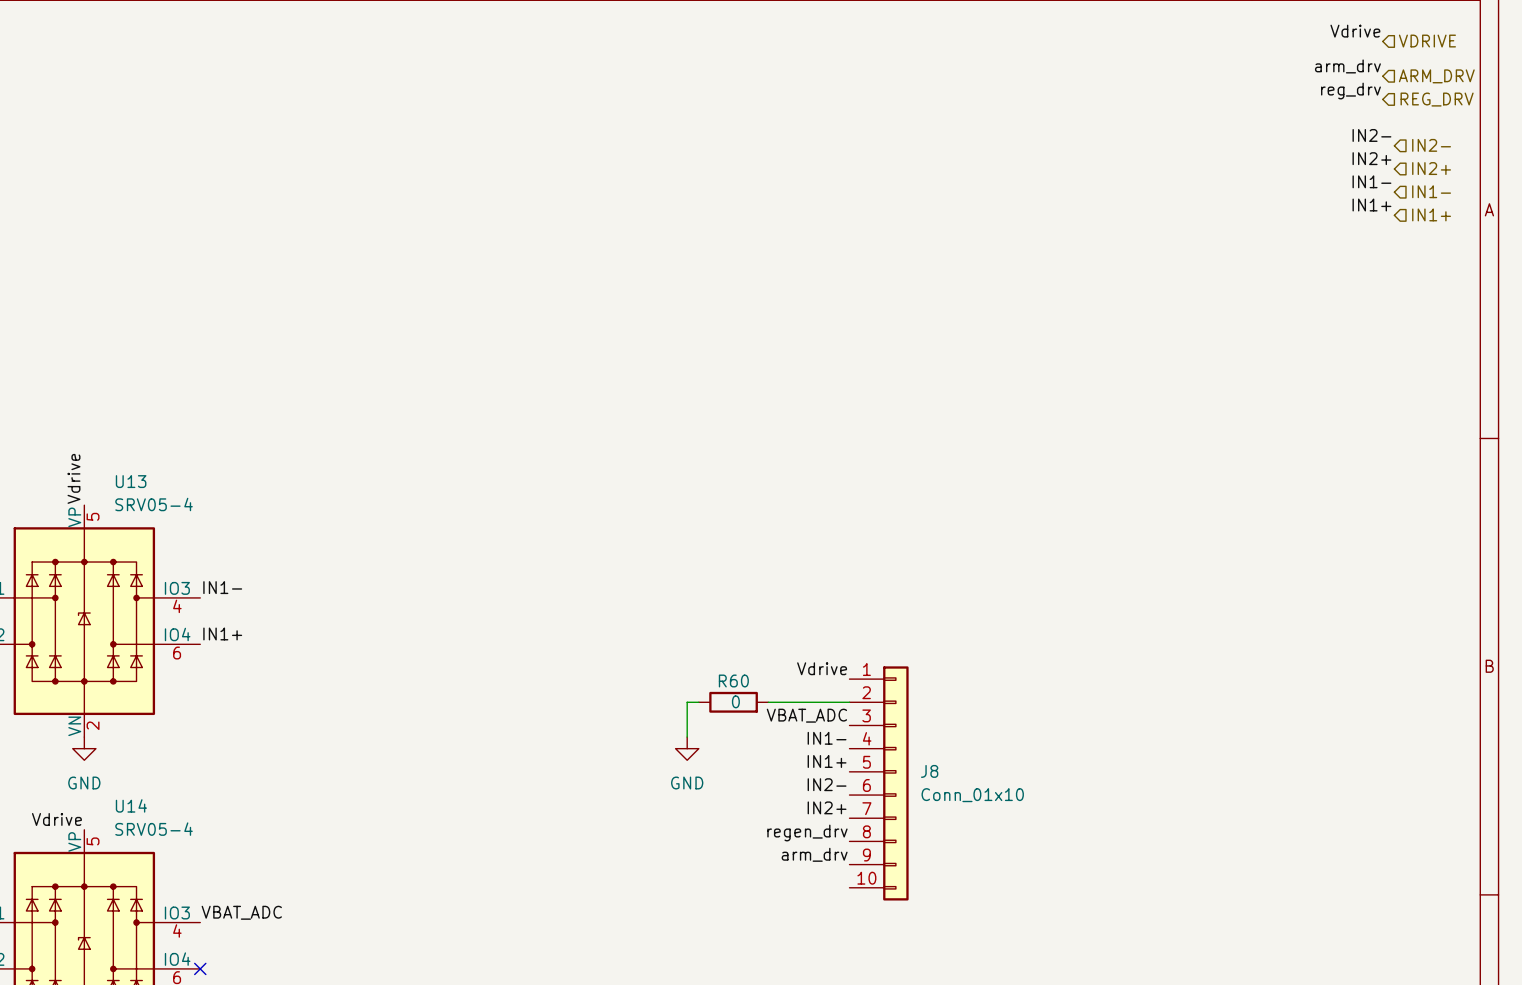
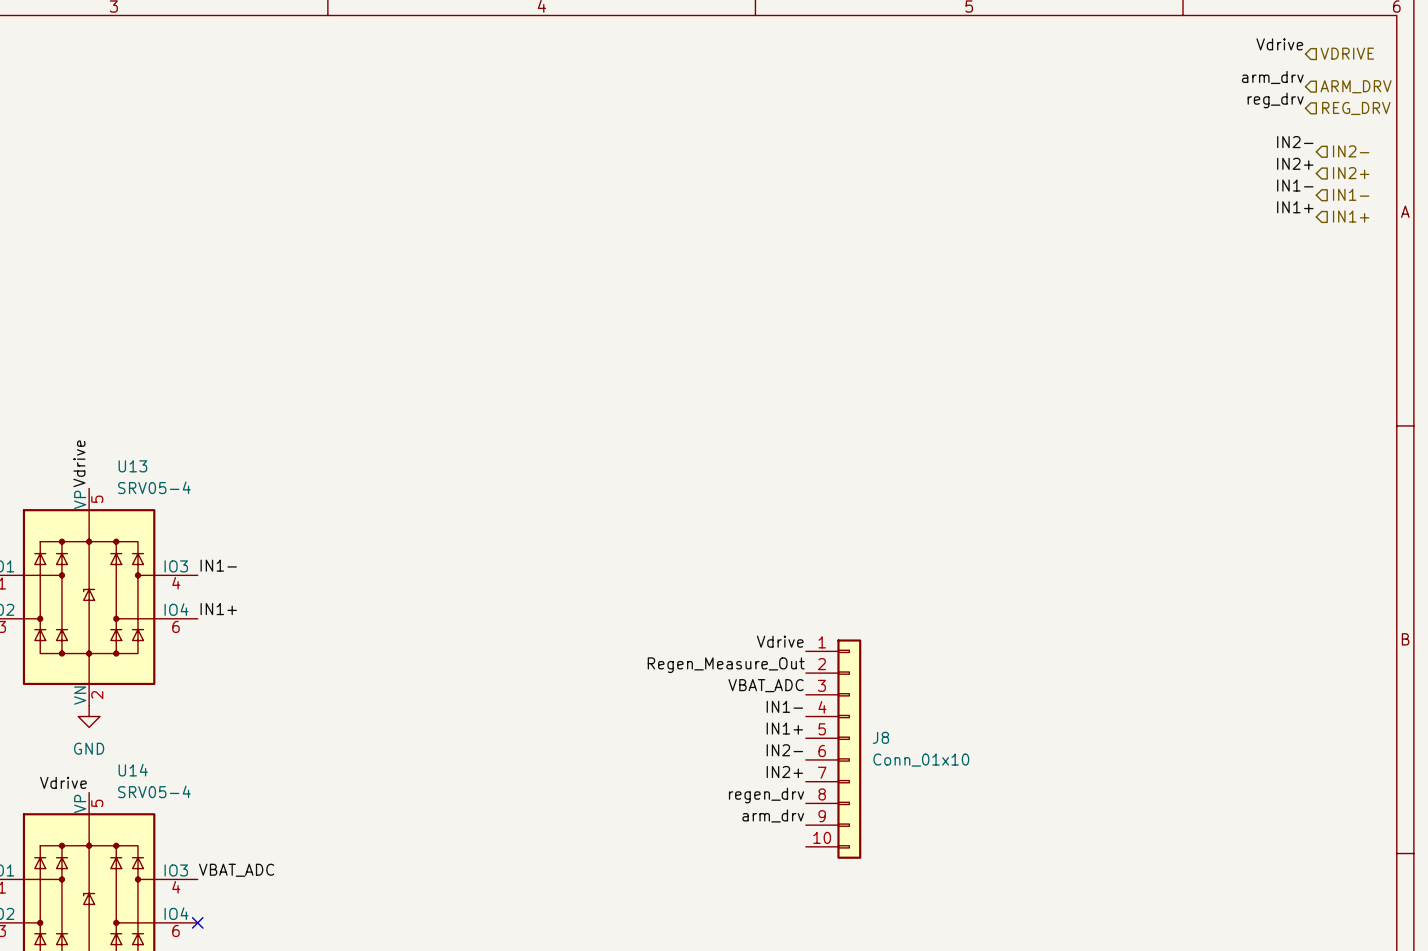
label: none -> Regen_Measure_Out (726, 665)
wire: (698, 702) (687, 702) (687, 737) -> none
R60: 0 (733, 702) -> none
wire: (768, 702) (849, 702) -> none
power symbol: GND (687, 748) -> none

